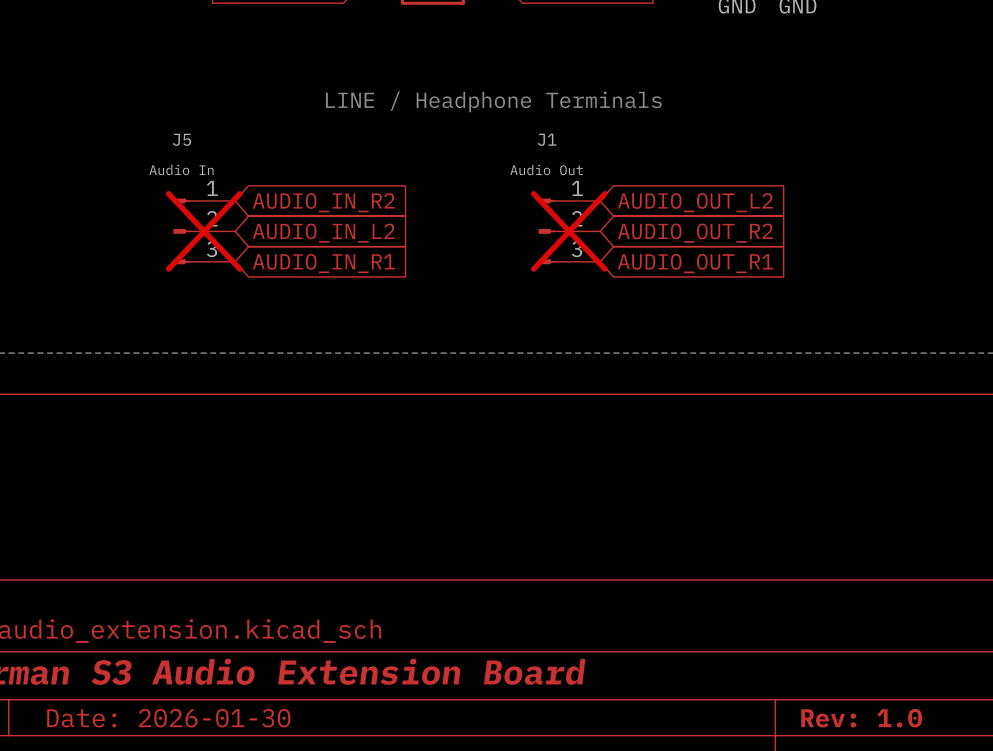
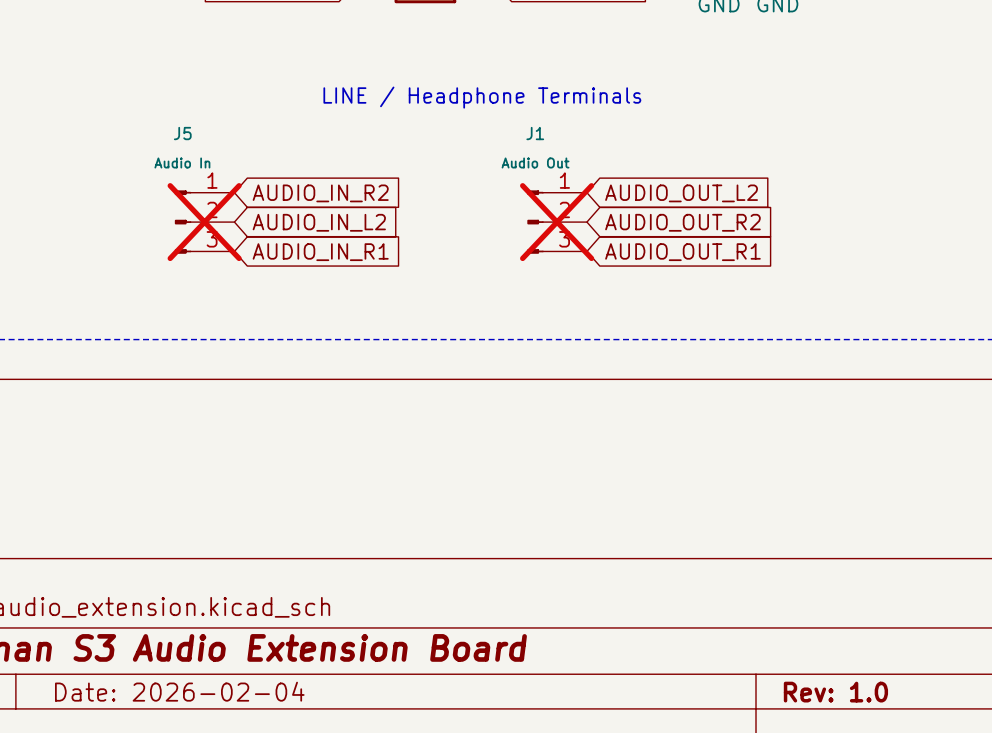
title block: Date: 2026-01-30 (168, 718) -> Date: 2026-02-04 (179, 691)

